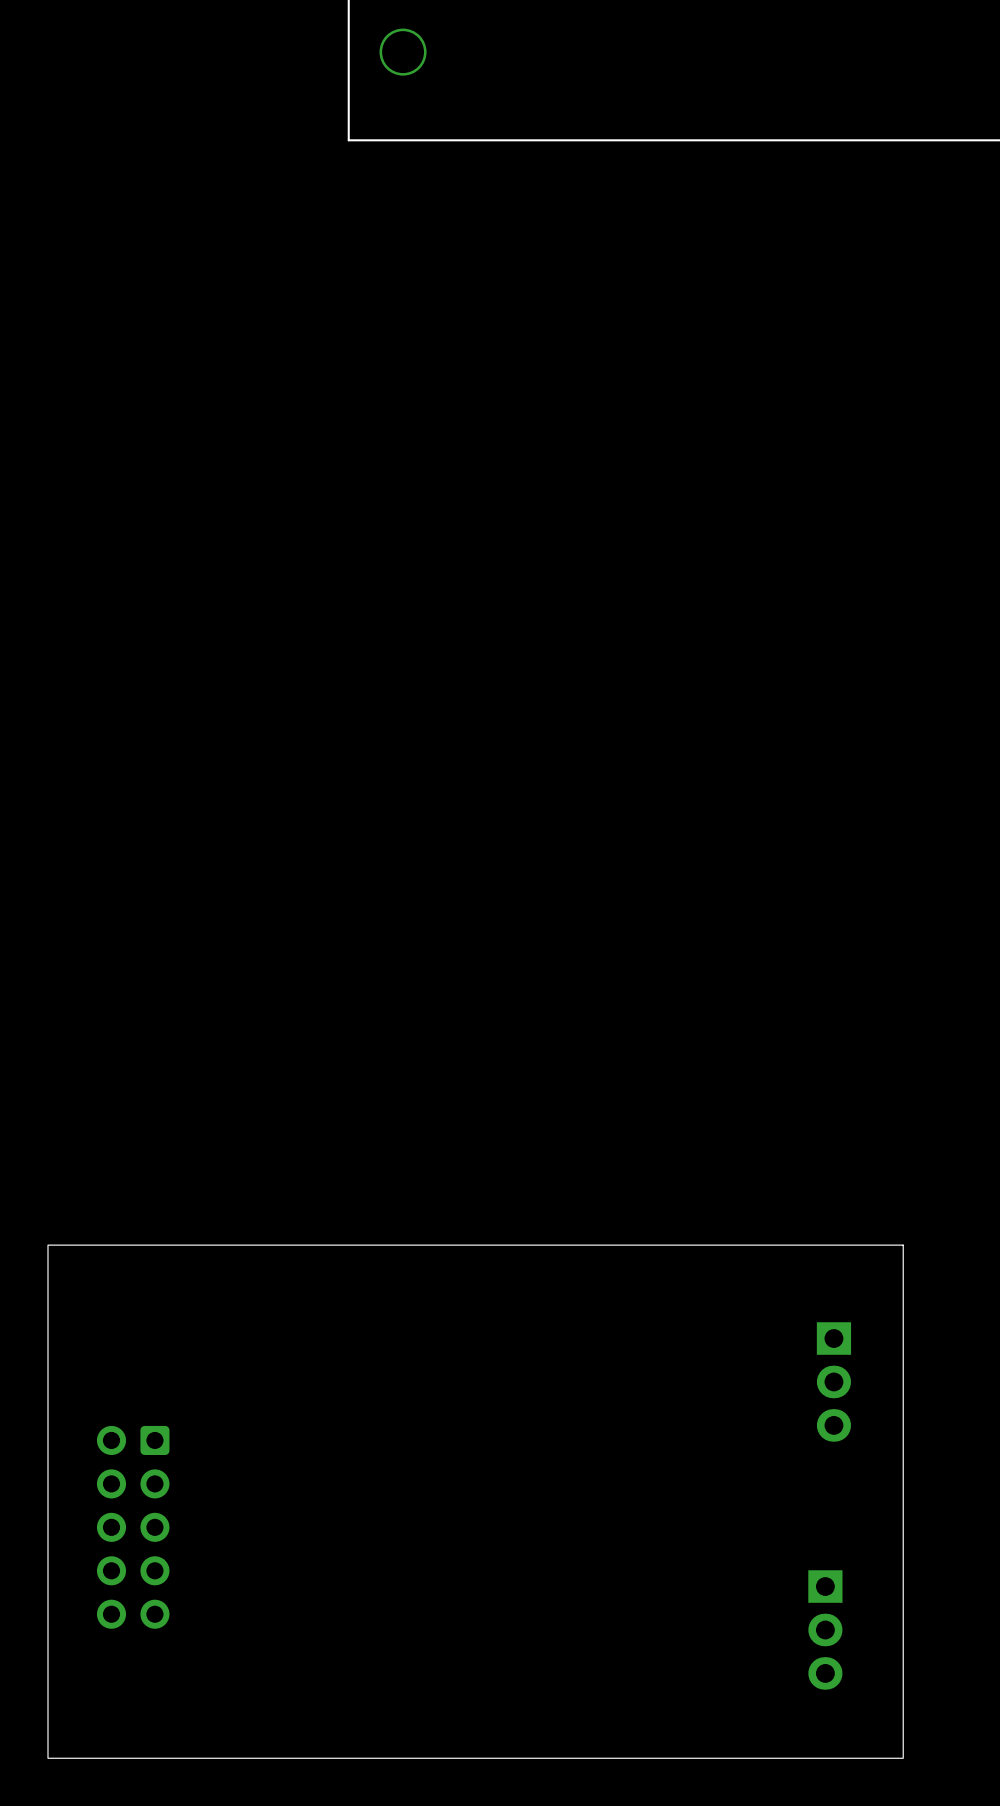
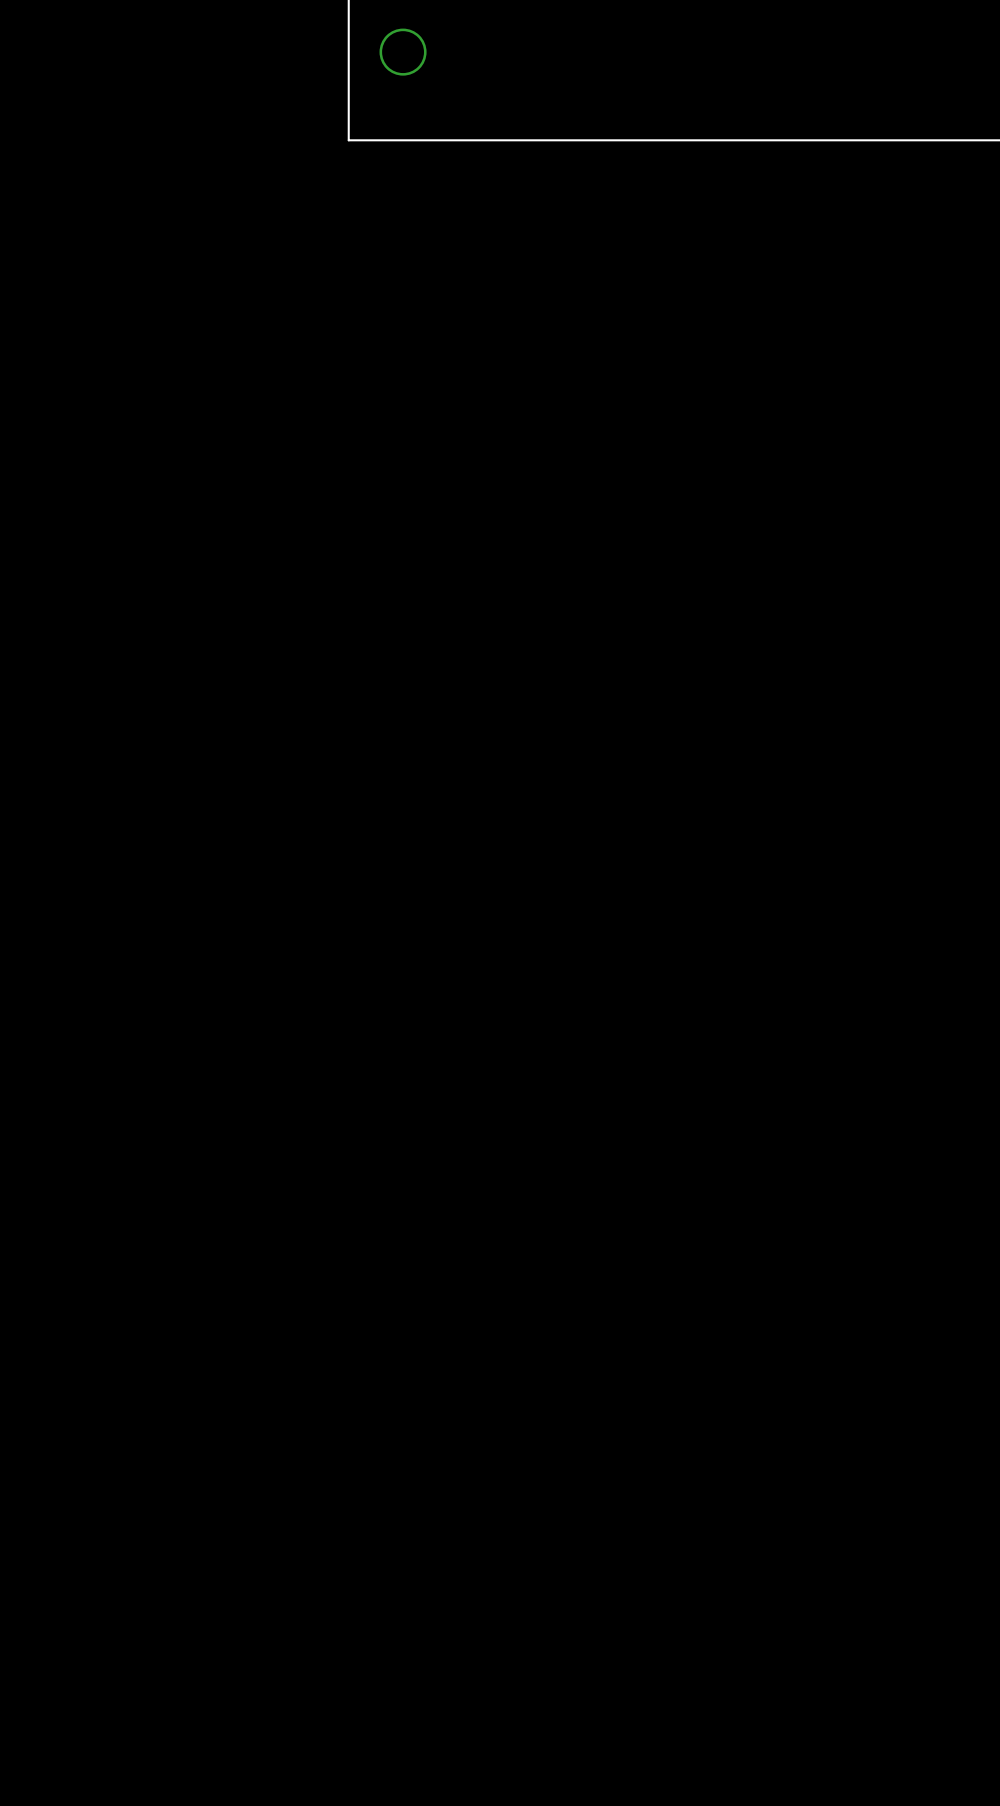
drawing: [47, 1244, 904, 1759] -> none
part: (833, 1381) -> none
part: (133, 1527) -> none
part: (825, 1629) -> none

